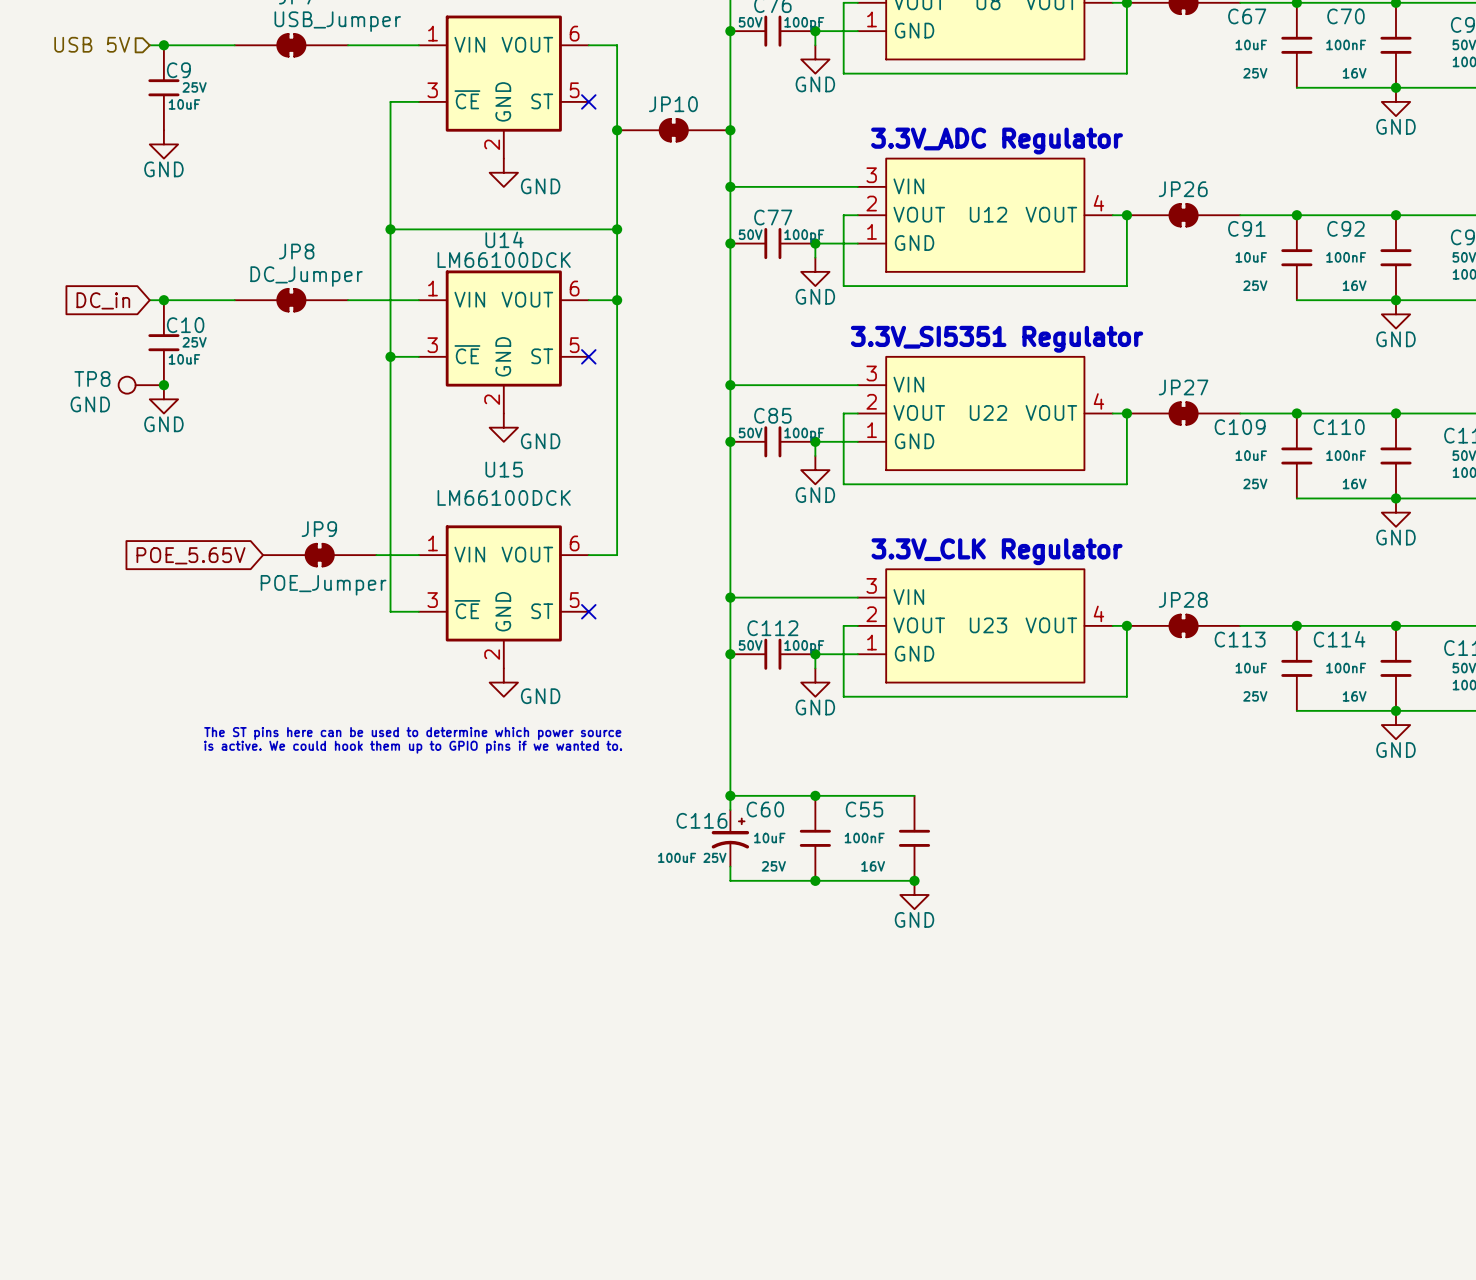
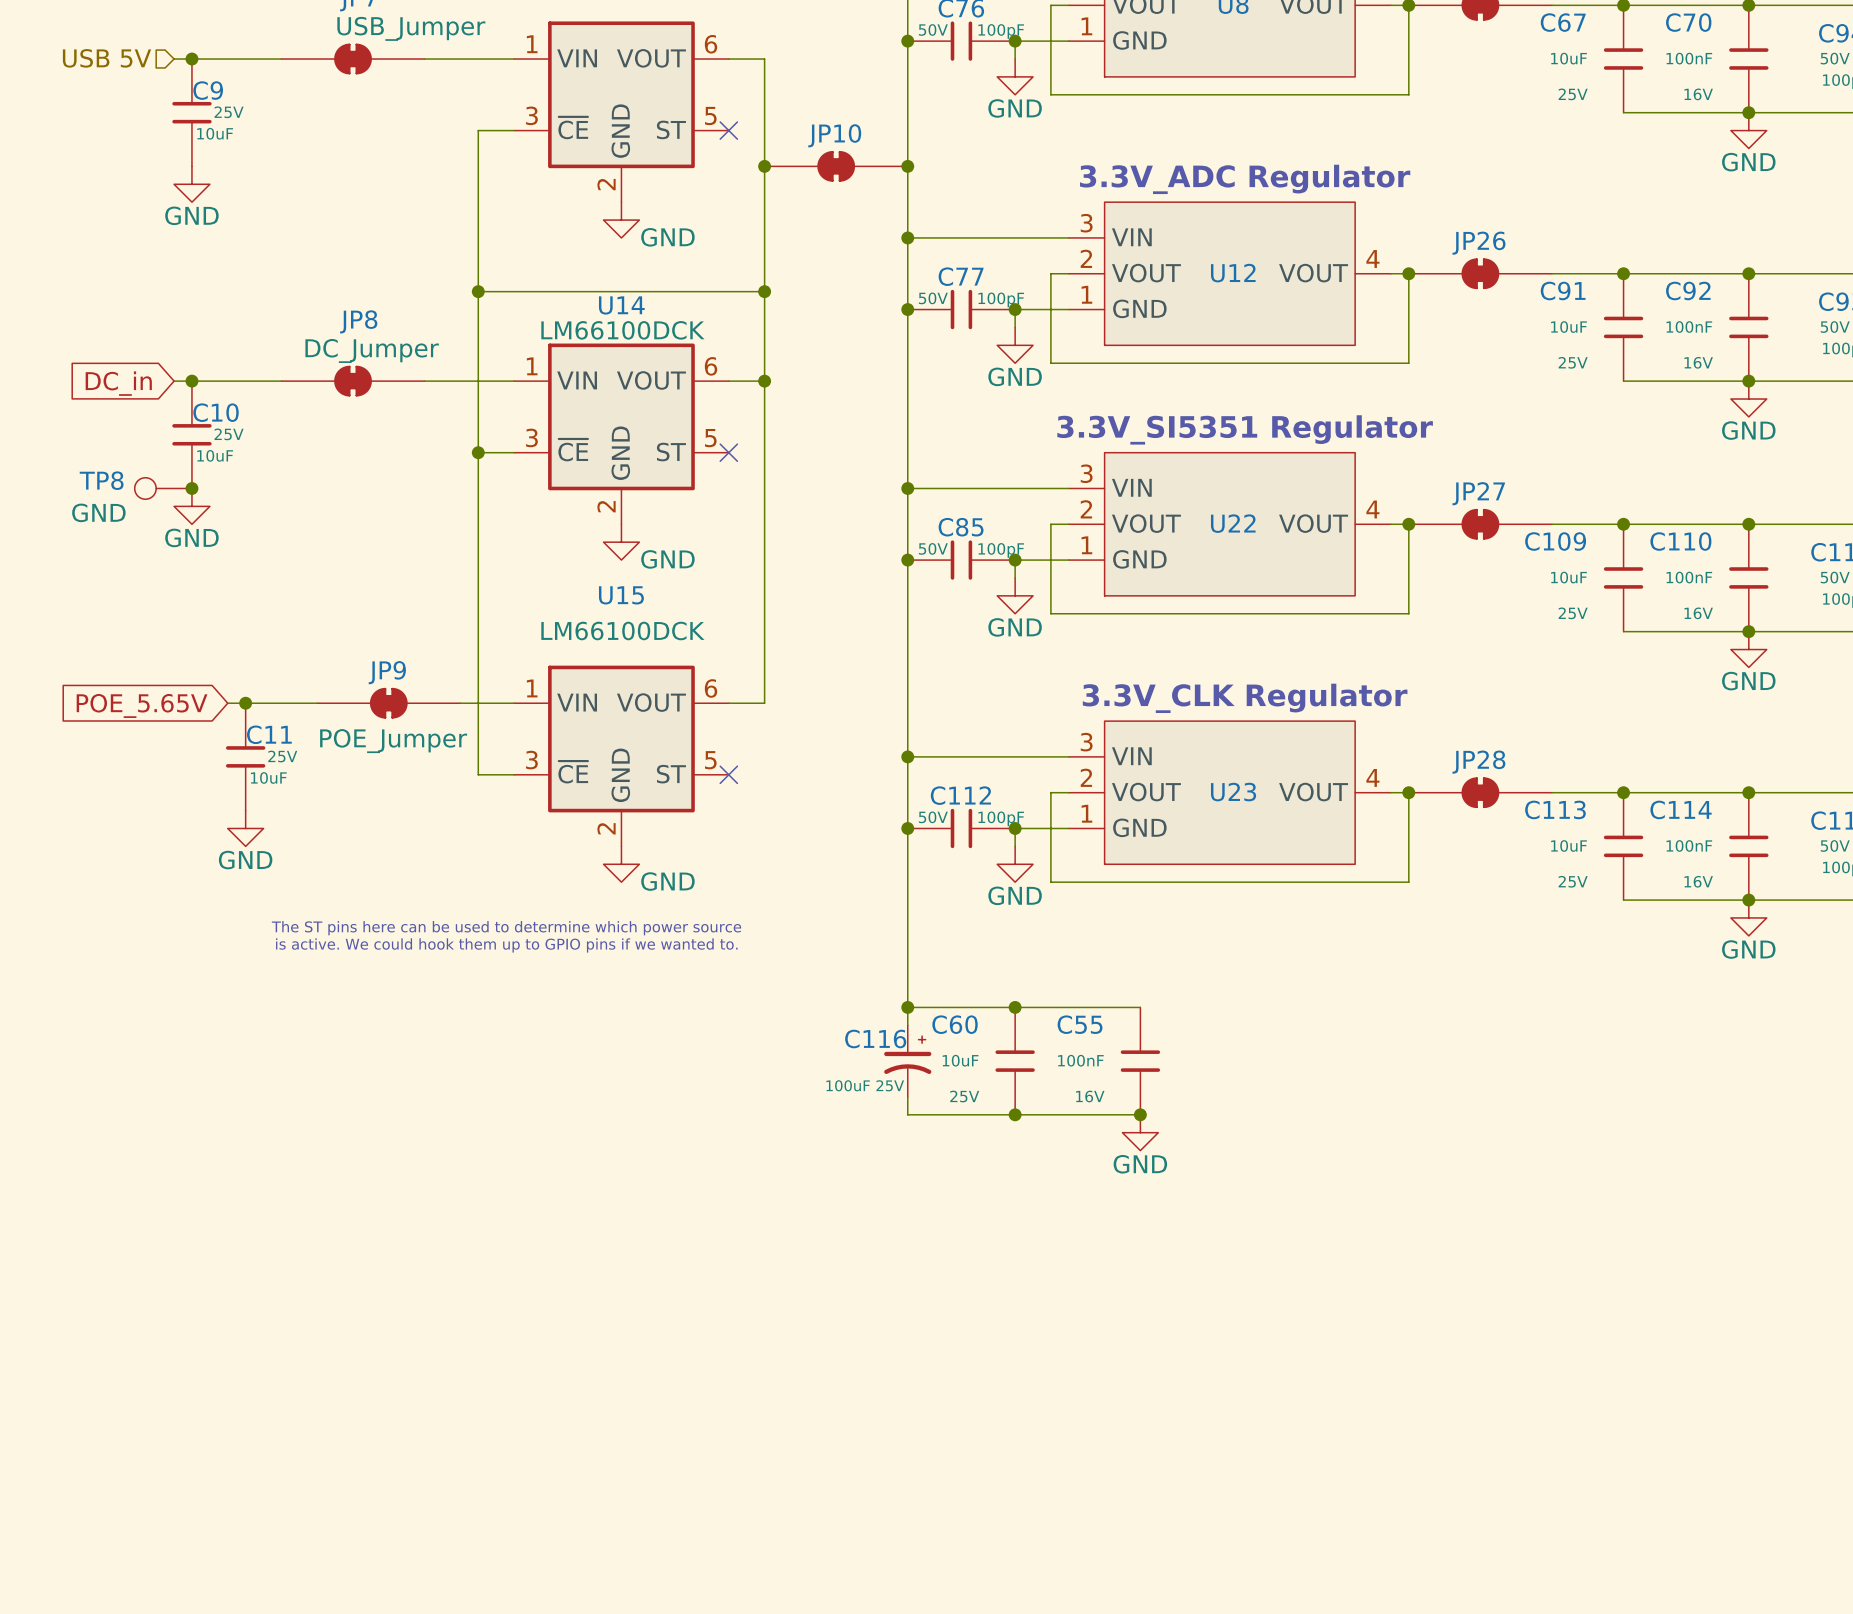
global label position: POE_5.65V (191, 555) -> POE_5.65V (142, 705)
wire: none -> (227, 703) (317, 703)
junction: none -> (245, 703)
C11: none -> 10uF (245, 756)
power symbol: none -> GND (245, 828)

